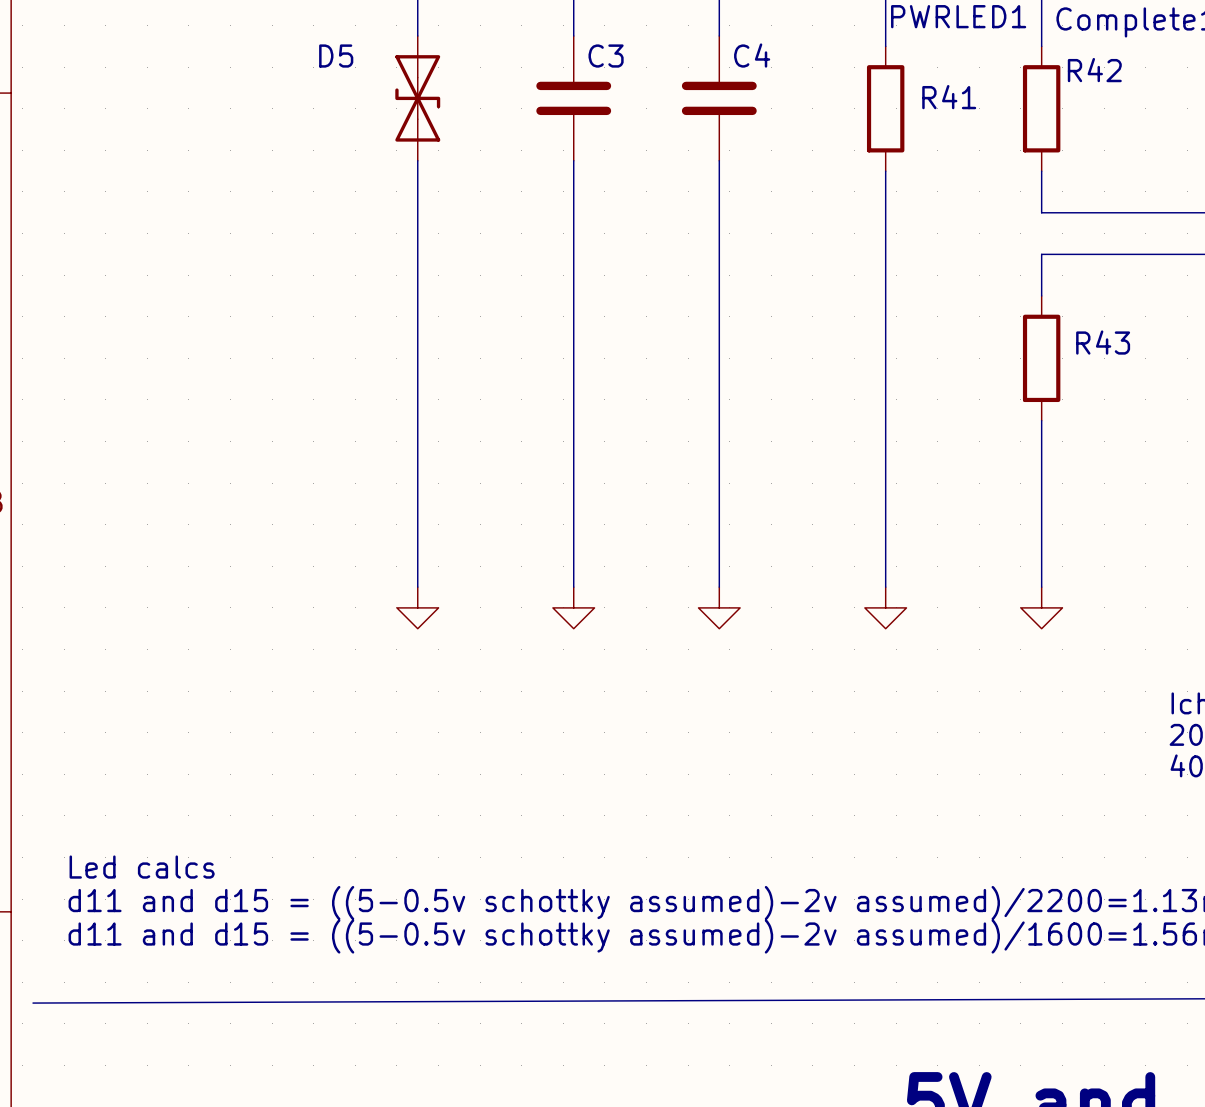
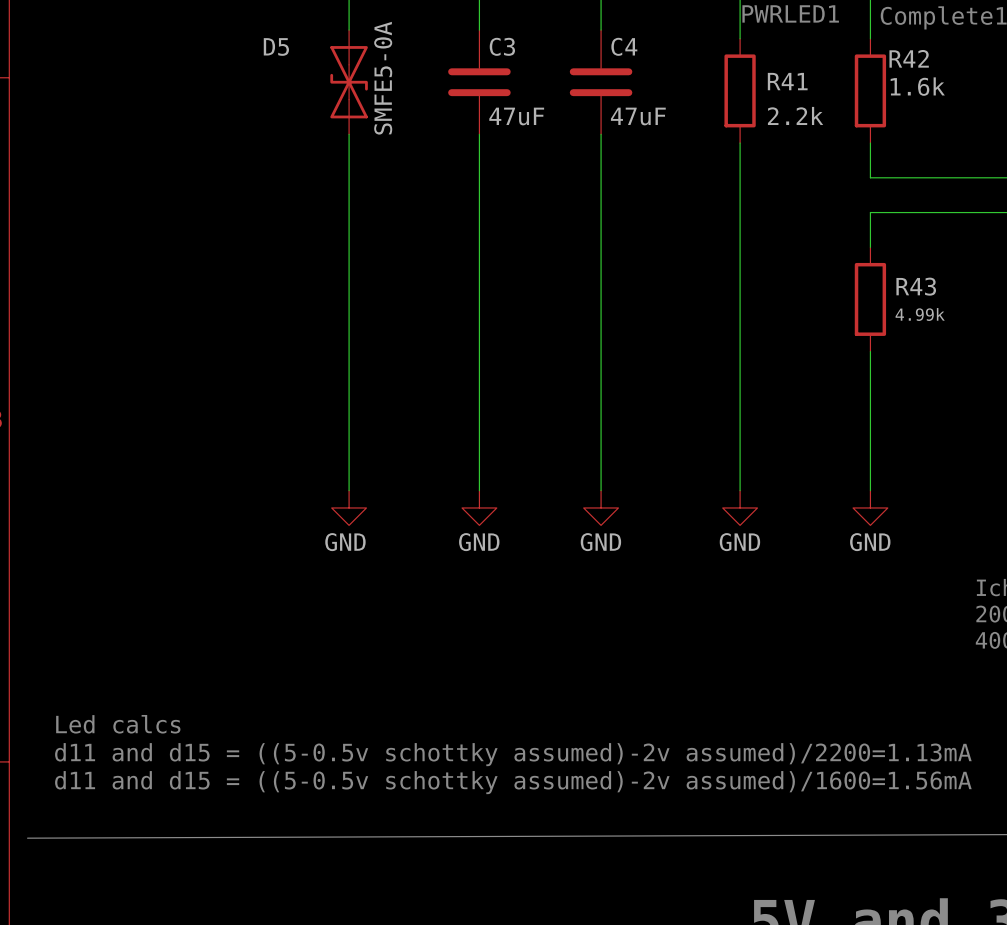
R42 value: none -> 1.6k (917, 86)
D5 value: none -> SMFE5-0A (383, 78)
C3 value: none -> 47uF (516, 116)
C4 value: none -> 47uF (638, 116)
R41 value: none -> 2.2k (795, 115)
R43 value: none -> 4.99k (920, 314)
power symbol text: none -> GND (345, 542)
power symbol text: none -> GND (479, 542)
power symbol text: none -> GND (600, 542)
power symbol text: none -> GND (739, 542)
power symbol text: none -> GND (870, 542)

